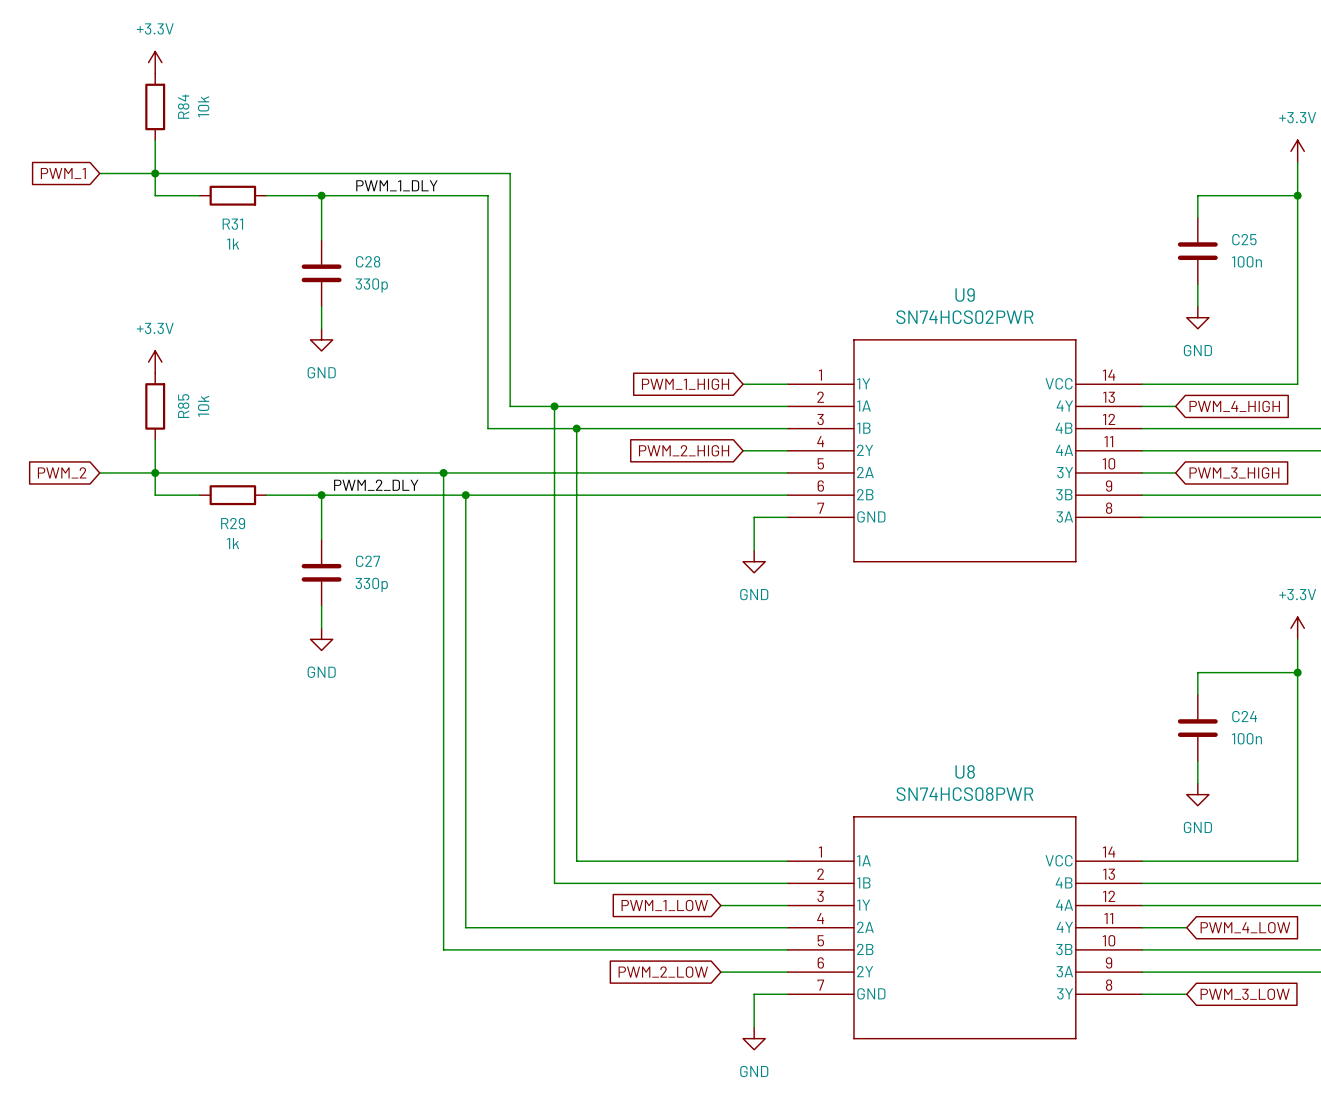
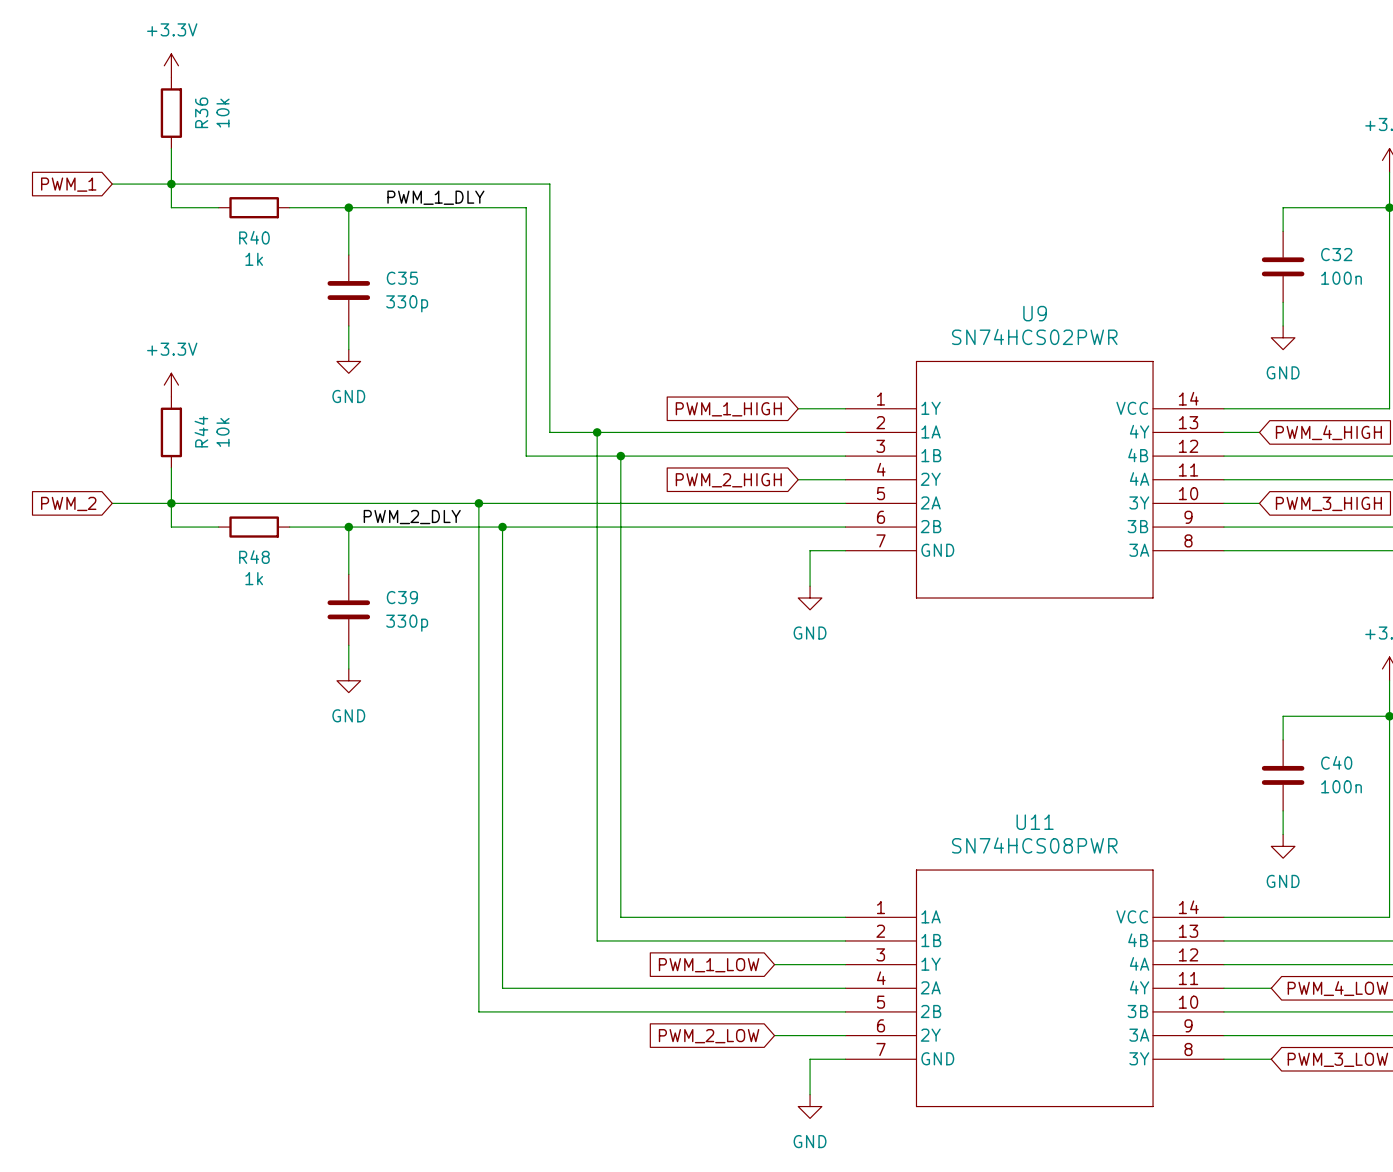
R84 name: R84 (183, 106) -> R36 (201, 112)
R31 name: R31 (232, 224) -> R40 (254, 237)
C25 name: C25 (1244, 239) -> C32 (1336, 254)
C28 name: C28 (368, 261) -> C35 (402, 278)
R85 name: R85 (183, 406) -> R44 (201, 431)
R29 name: R29 (233, 523) -> R48 (254, 557)
C27 name: C27 (368, 561) -> C39 (402, 597)
C24 name: C24 (1244, 716) -> C40 (1336, 762)
U8 name: U8 (965, 771) -> U11 (1035, 822)

